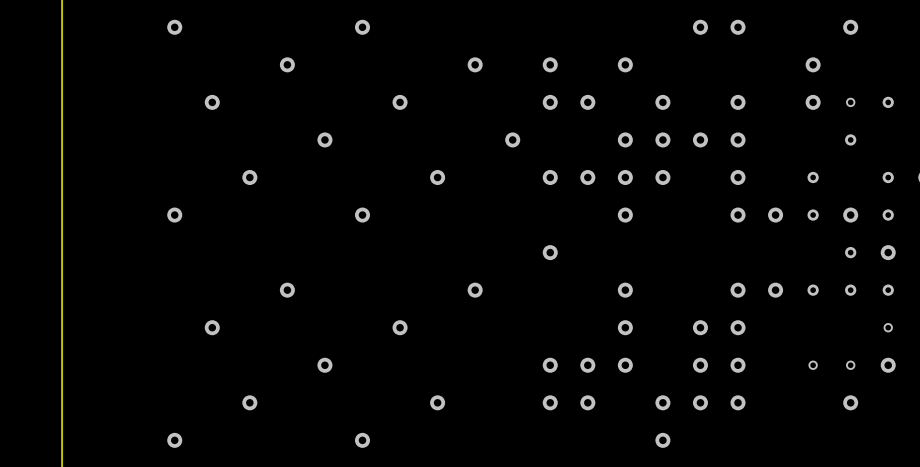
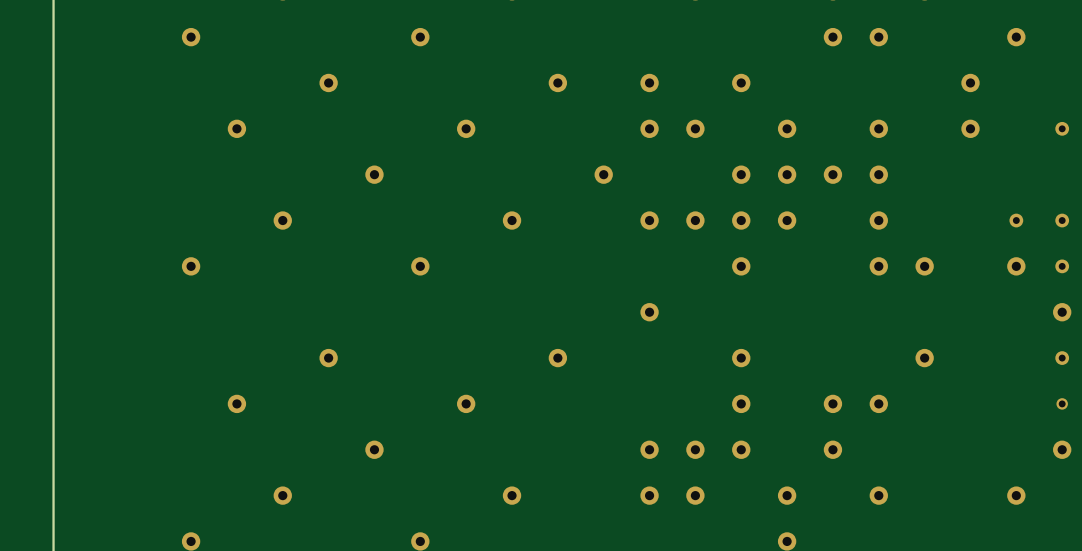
via: (850, 102) -> none
via: (850, 139) -> none
via: (813, 177) -> none
via: none -> (1016, 220)
via: (813, 215) -> none
via: (850, 252) -> none
via: (738, 290) -> none
via: (813, 290) -> none
via: (850, 290) -> none
via: (738, 365) -> none
via: (813, 365) -> none
via: (850, 365) -> none
via: (700, 402) -> none

